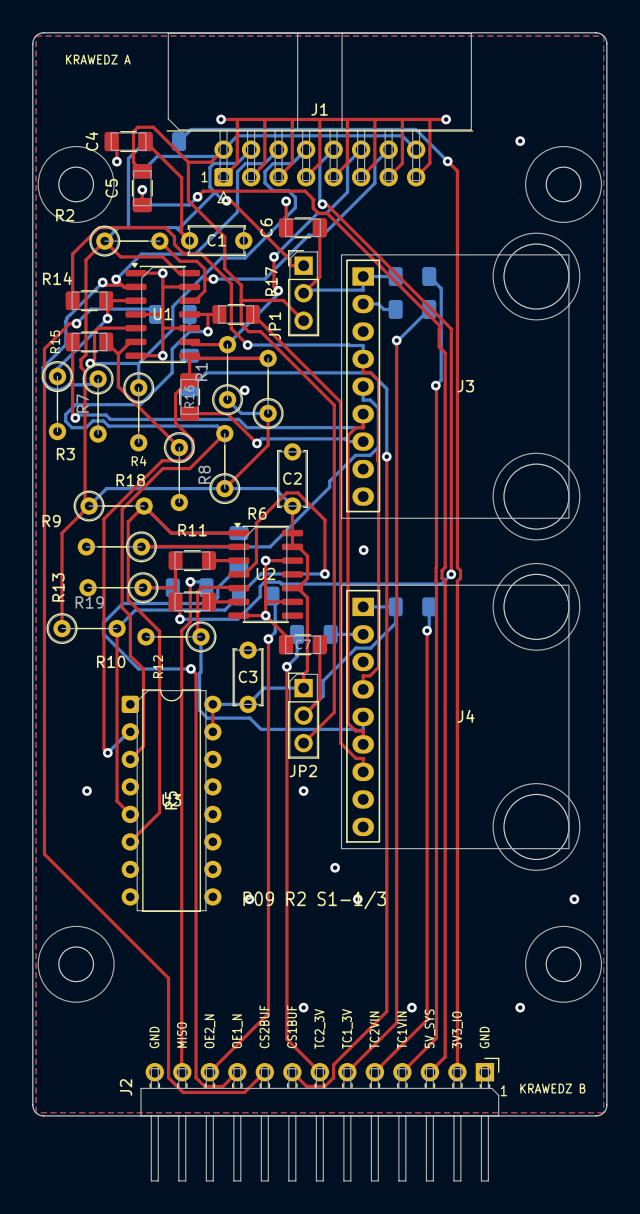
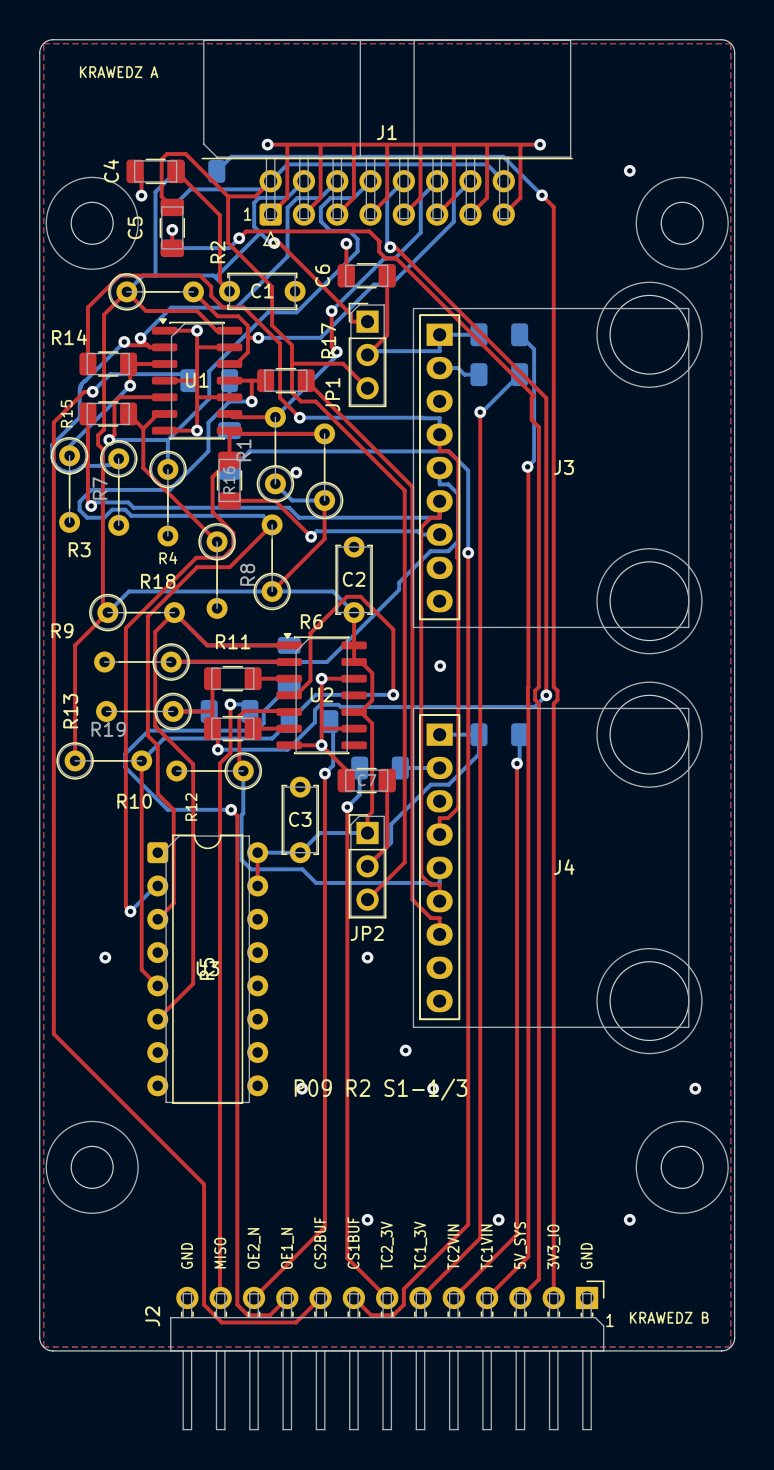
R2 name rotation: 0° (65, 215) -> 90° counterclockwise (217, 252)
R2 name position: R2 (65, 215) -> R2 (217, 252)

